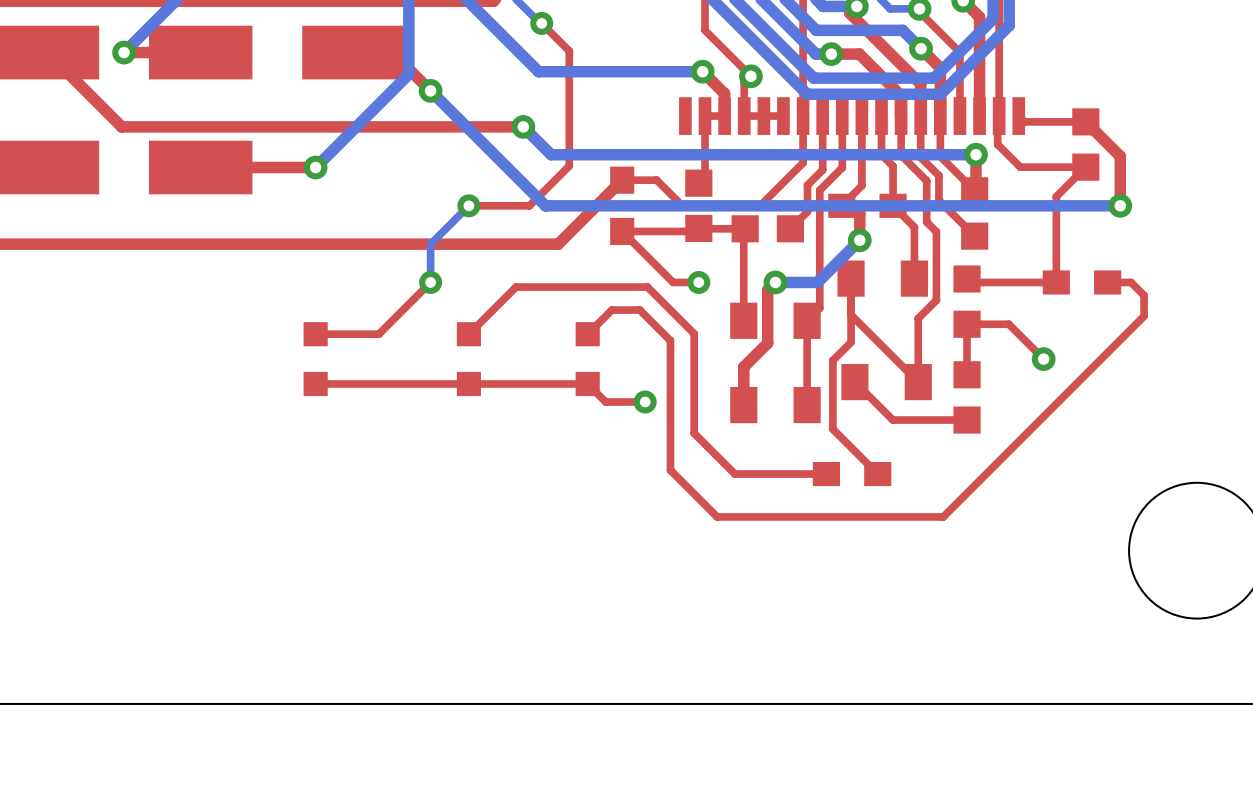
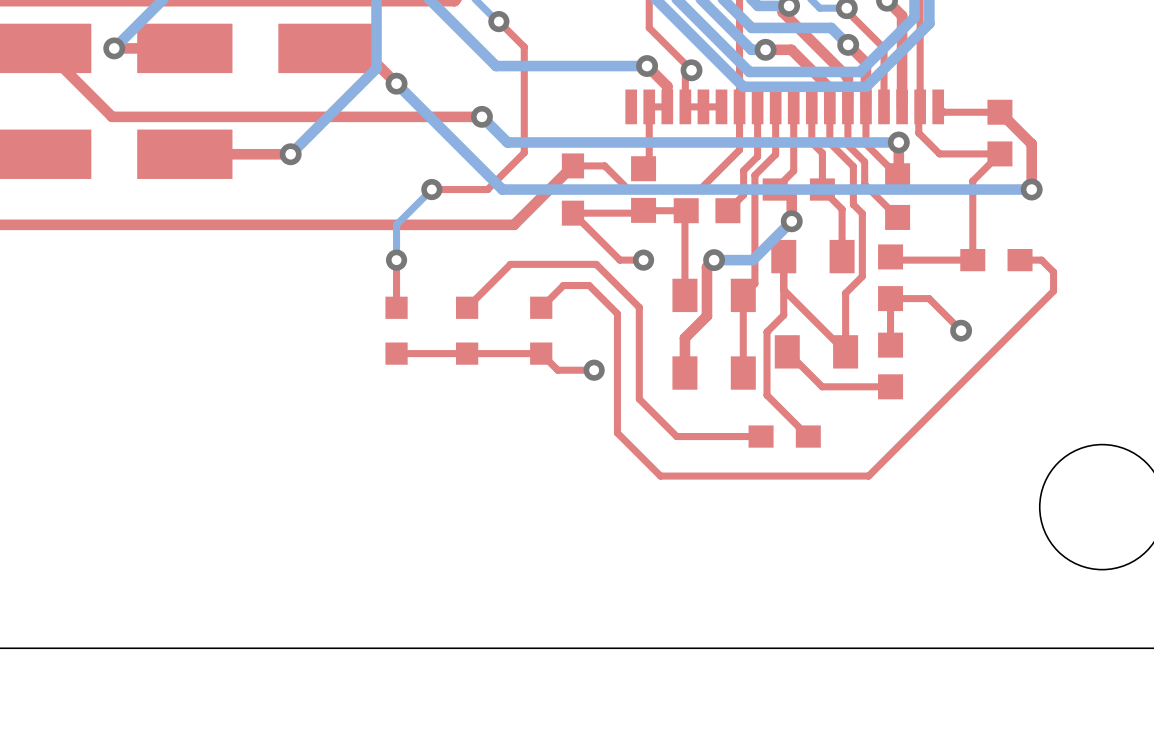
top track: (430, 282) (378, 334) (315, 334) -> (396, 260) (396, 307)
top track: (554, 287) (516, 287) (468, 334) -> (510, 264) (467, 307)
part: (315, 359) -> none
part: none -> (396, 330)
part: (468, 359) -> none
part: none -> (467, 330)
top track: (430, 383) (315, 383) -> none

